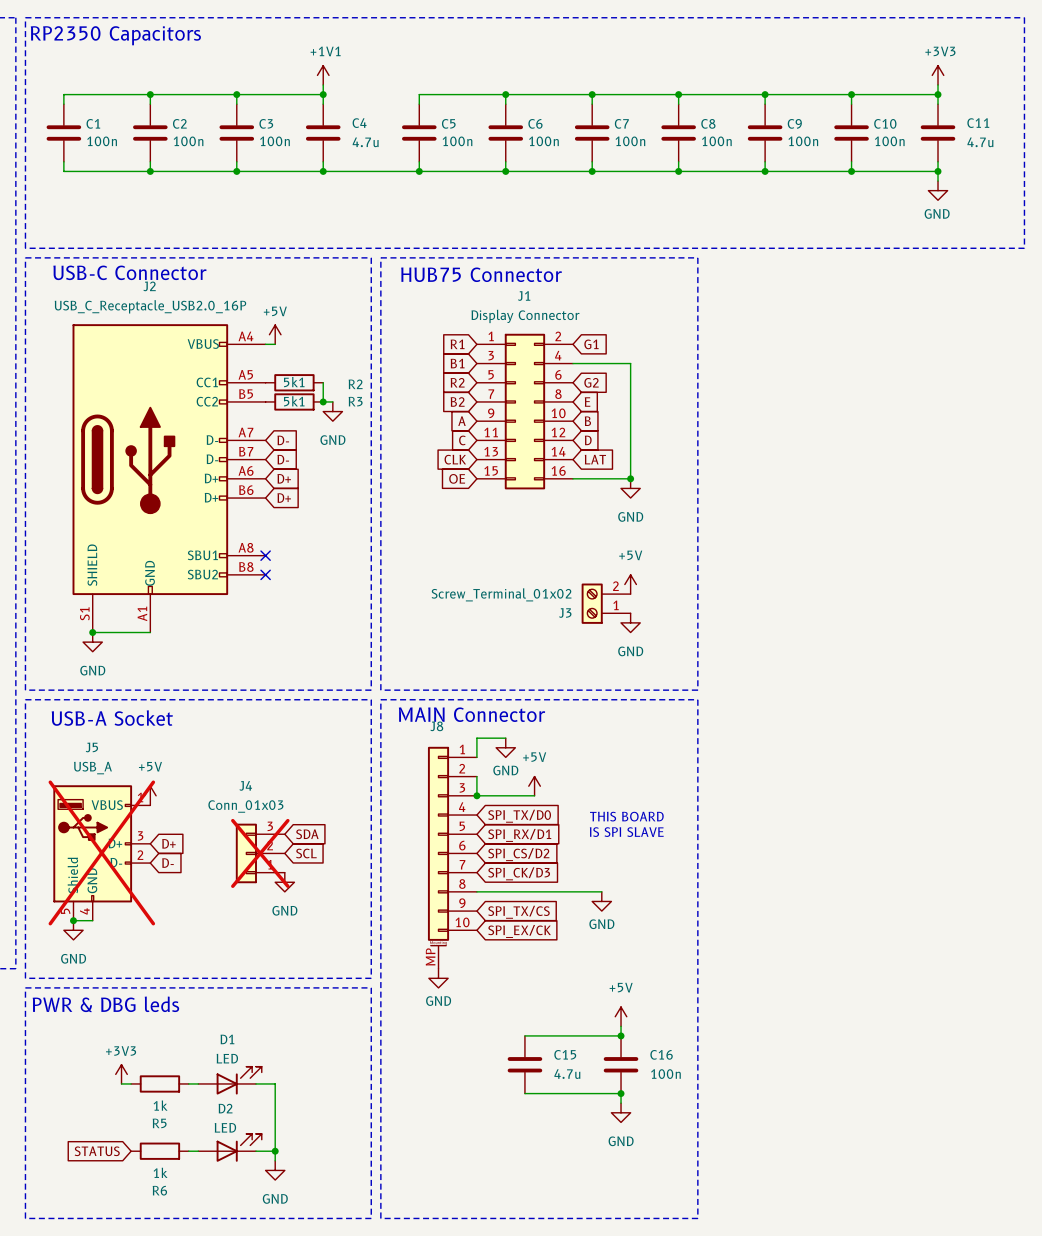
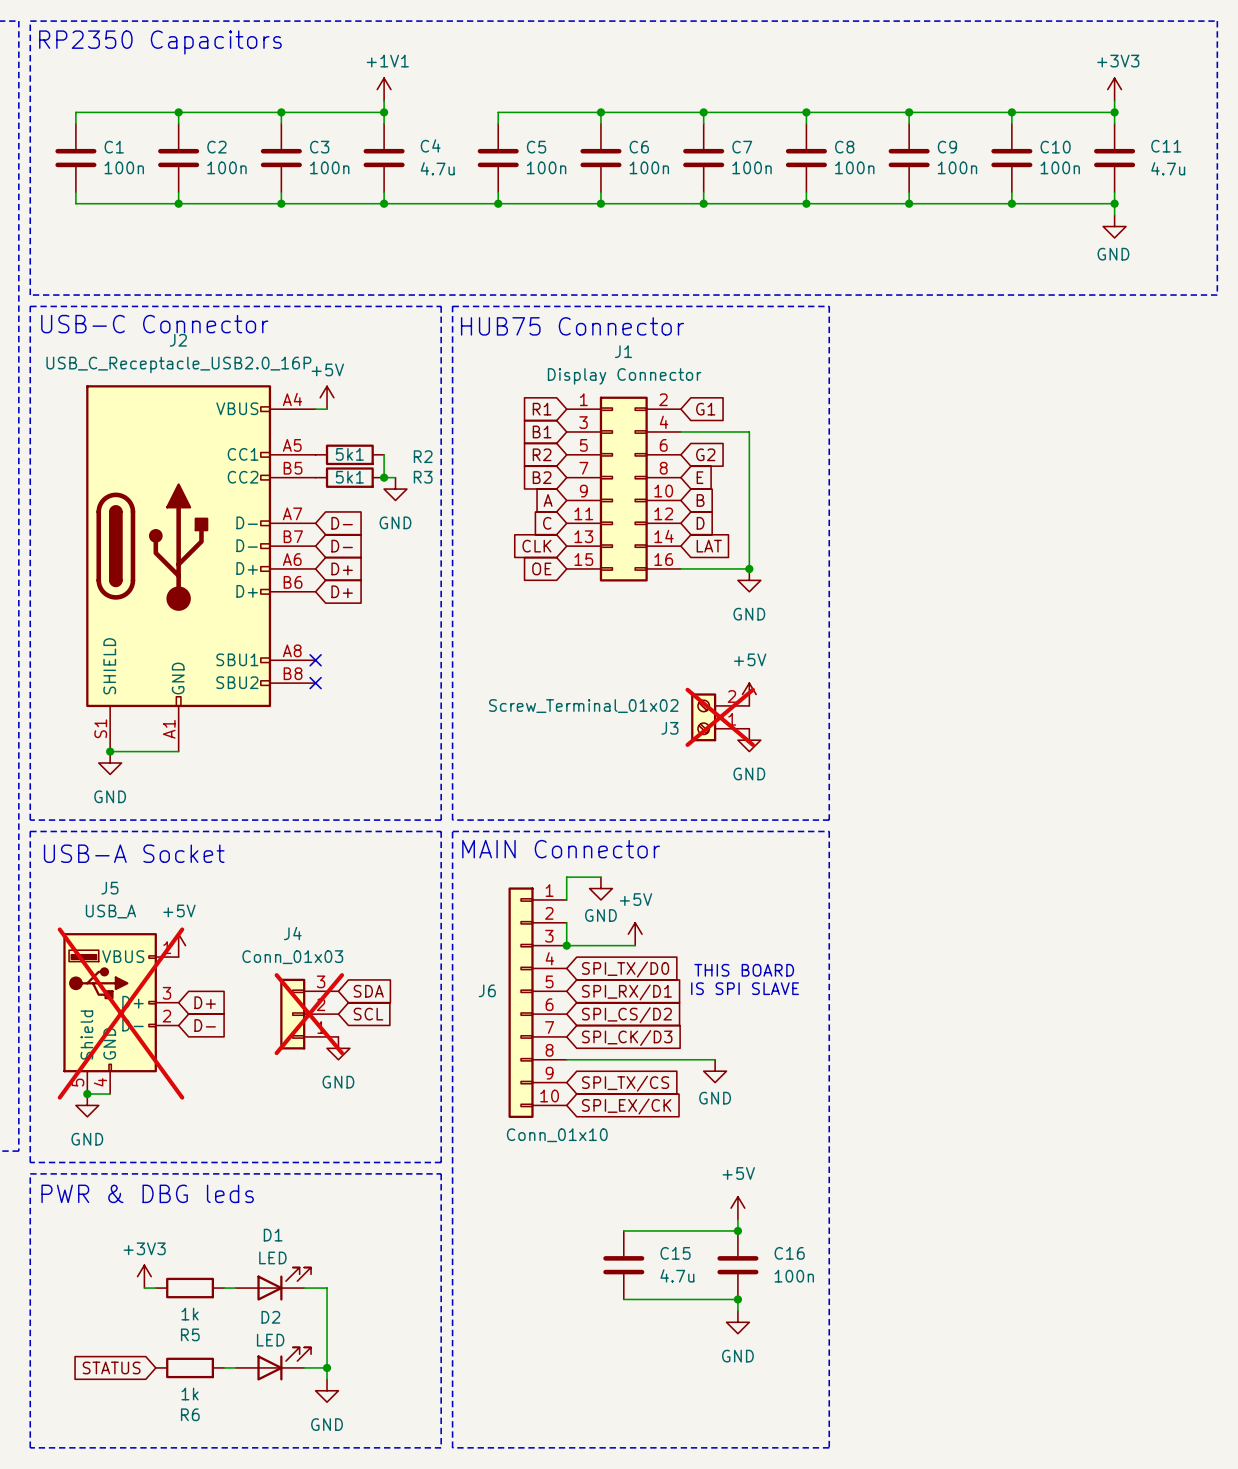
J3 do-not-place cross: none -> (720, 717)
J6: none -> Conn_01x10 (537, 1002)
J8: (452, 857) -> none
power symbol: GND (438, 978) -> none

